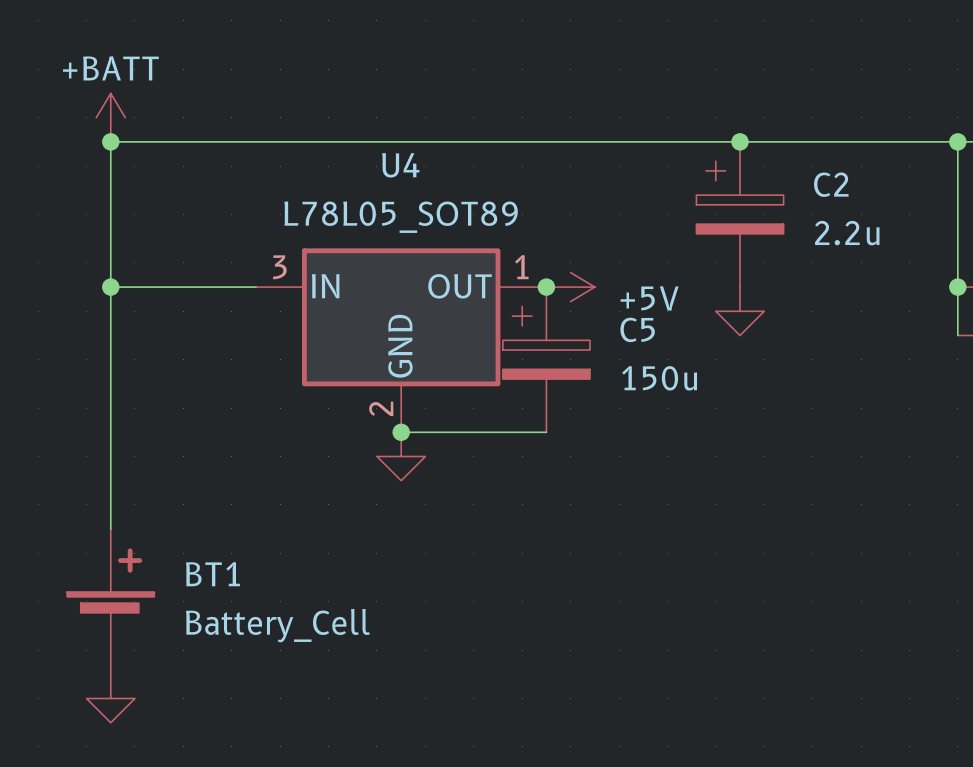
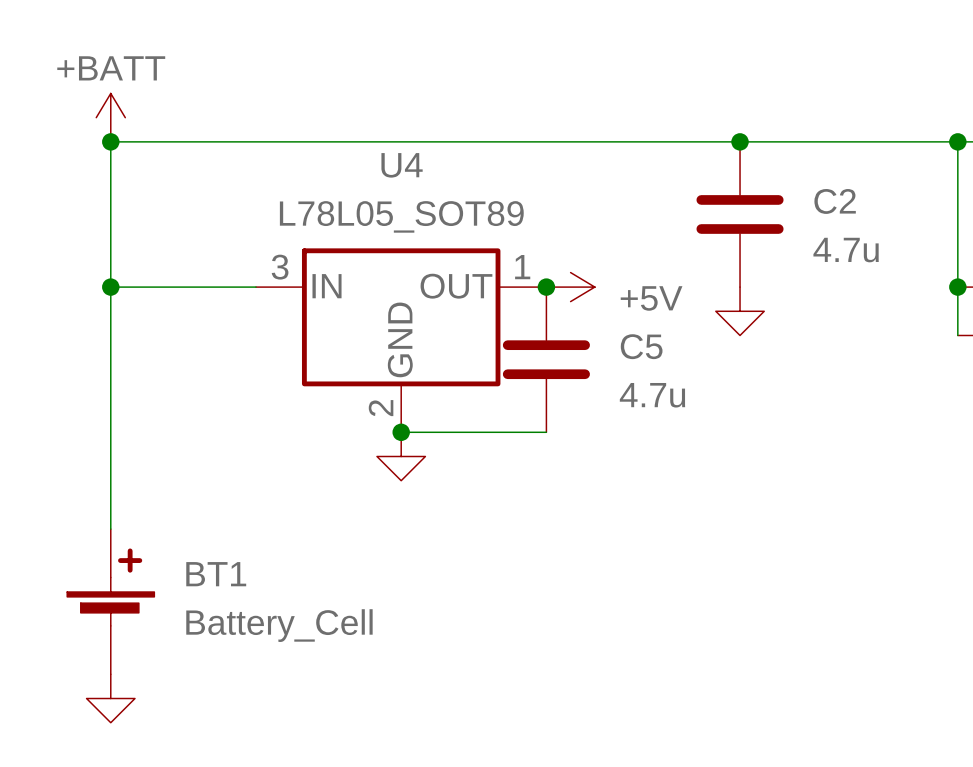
C2 symbol: [696, 141, 784, 288] -> [696, 141, 784, 288]
C2 value: 2.2u (847, 233) -> 4.7u (846, 250)
C5 symbol: [502, 287, 590, 433] -> [502, 287, 590, 433]
C5 value: 150u (659, 378) -> 4.7u (652, 395)

